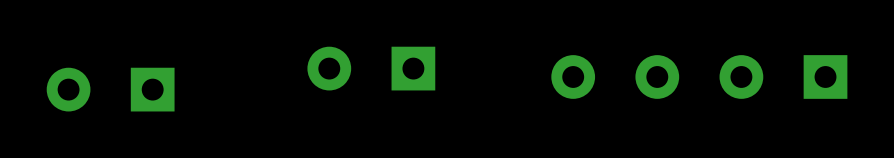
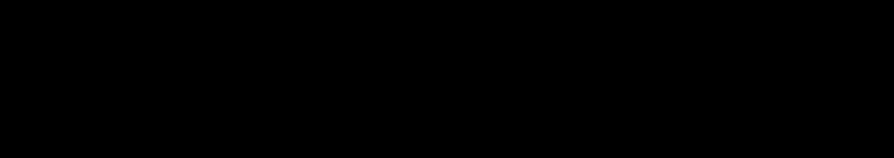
part: (371, 68) -> none
part: (699, 76) -> none
part: (110, 89) -> none

